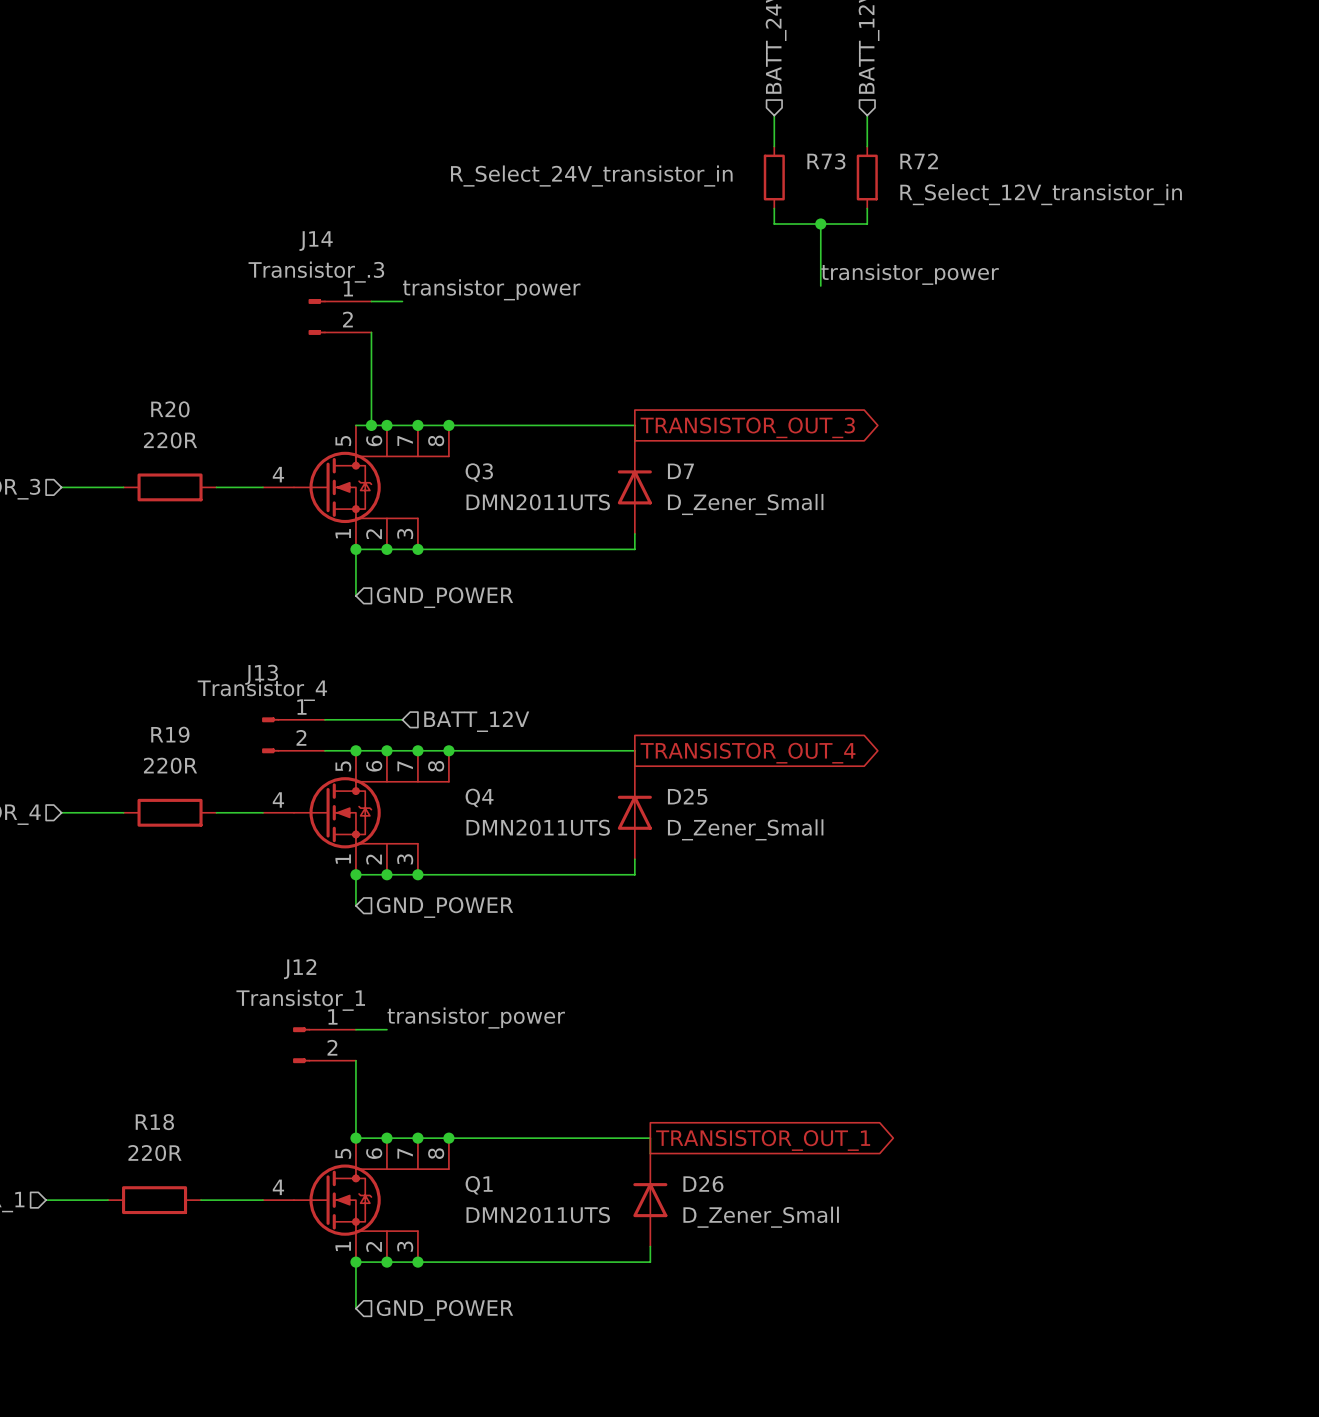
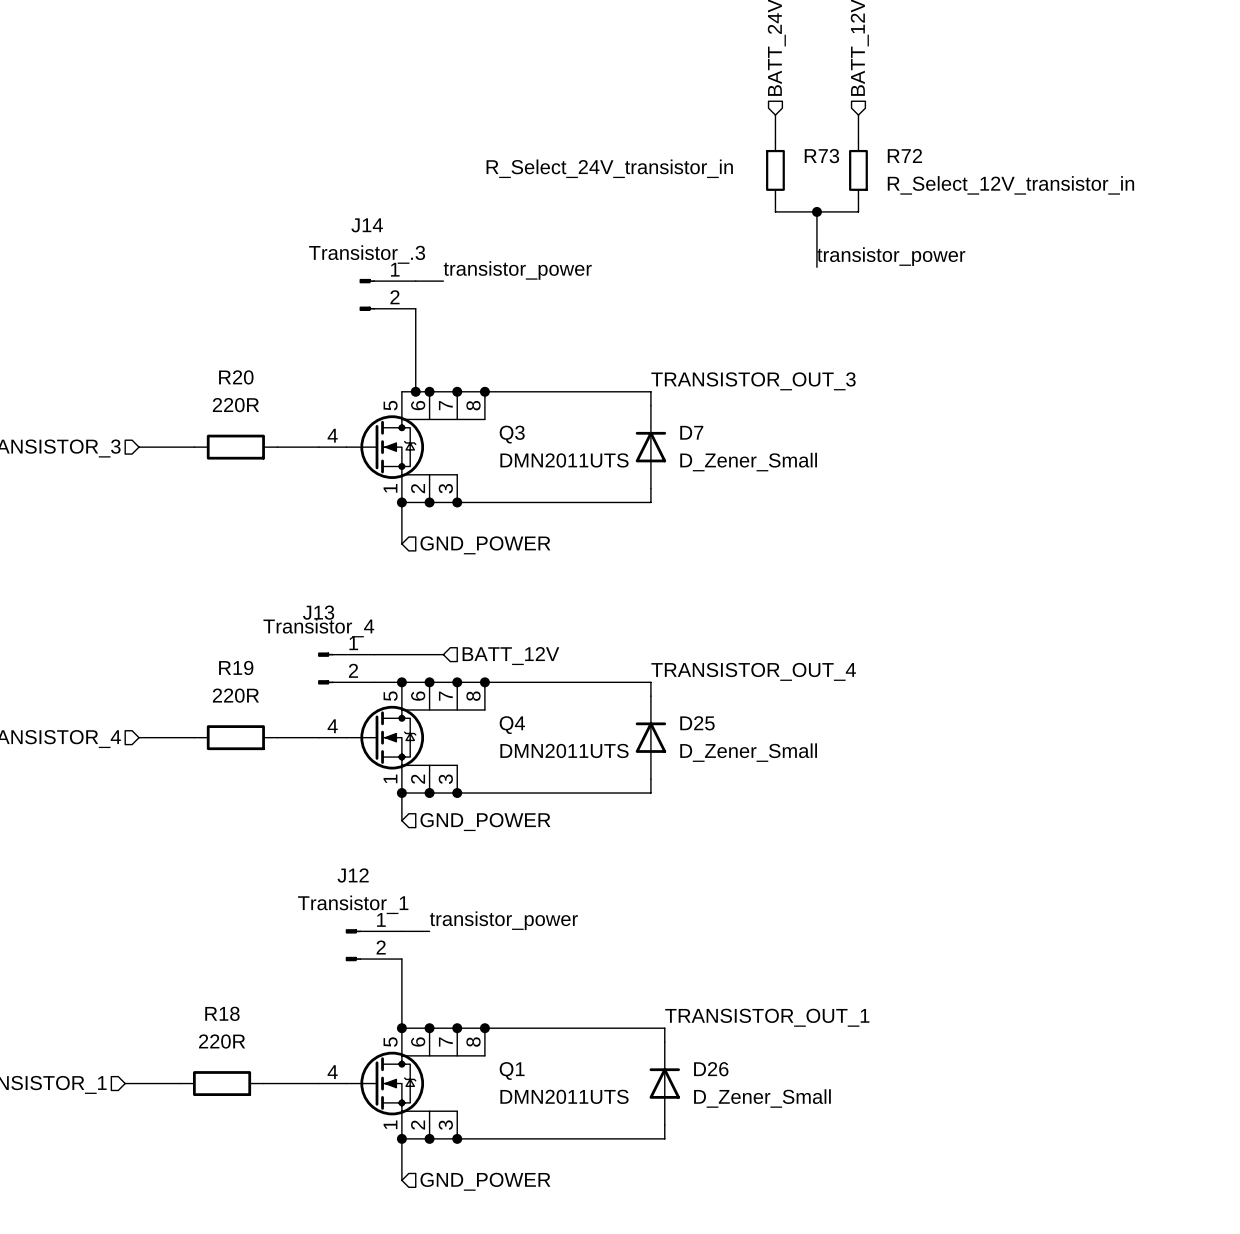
label: none -> TRANSISTOR_OUT_3 (753, 381)
global label: TRANSISTOR_OUT_3 (747, 427) -> none
label: none -> TRANSISTOR_OUT_4 (753, 671)
global label: TRANSISTOR_OUT_4 (748, 753) -> none
label: none -> TRANSISTOR_OUT_1 (767, 1017)
global label: TRANSISTOR_OUT_1 (763, 1140) -> none

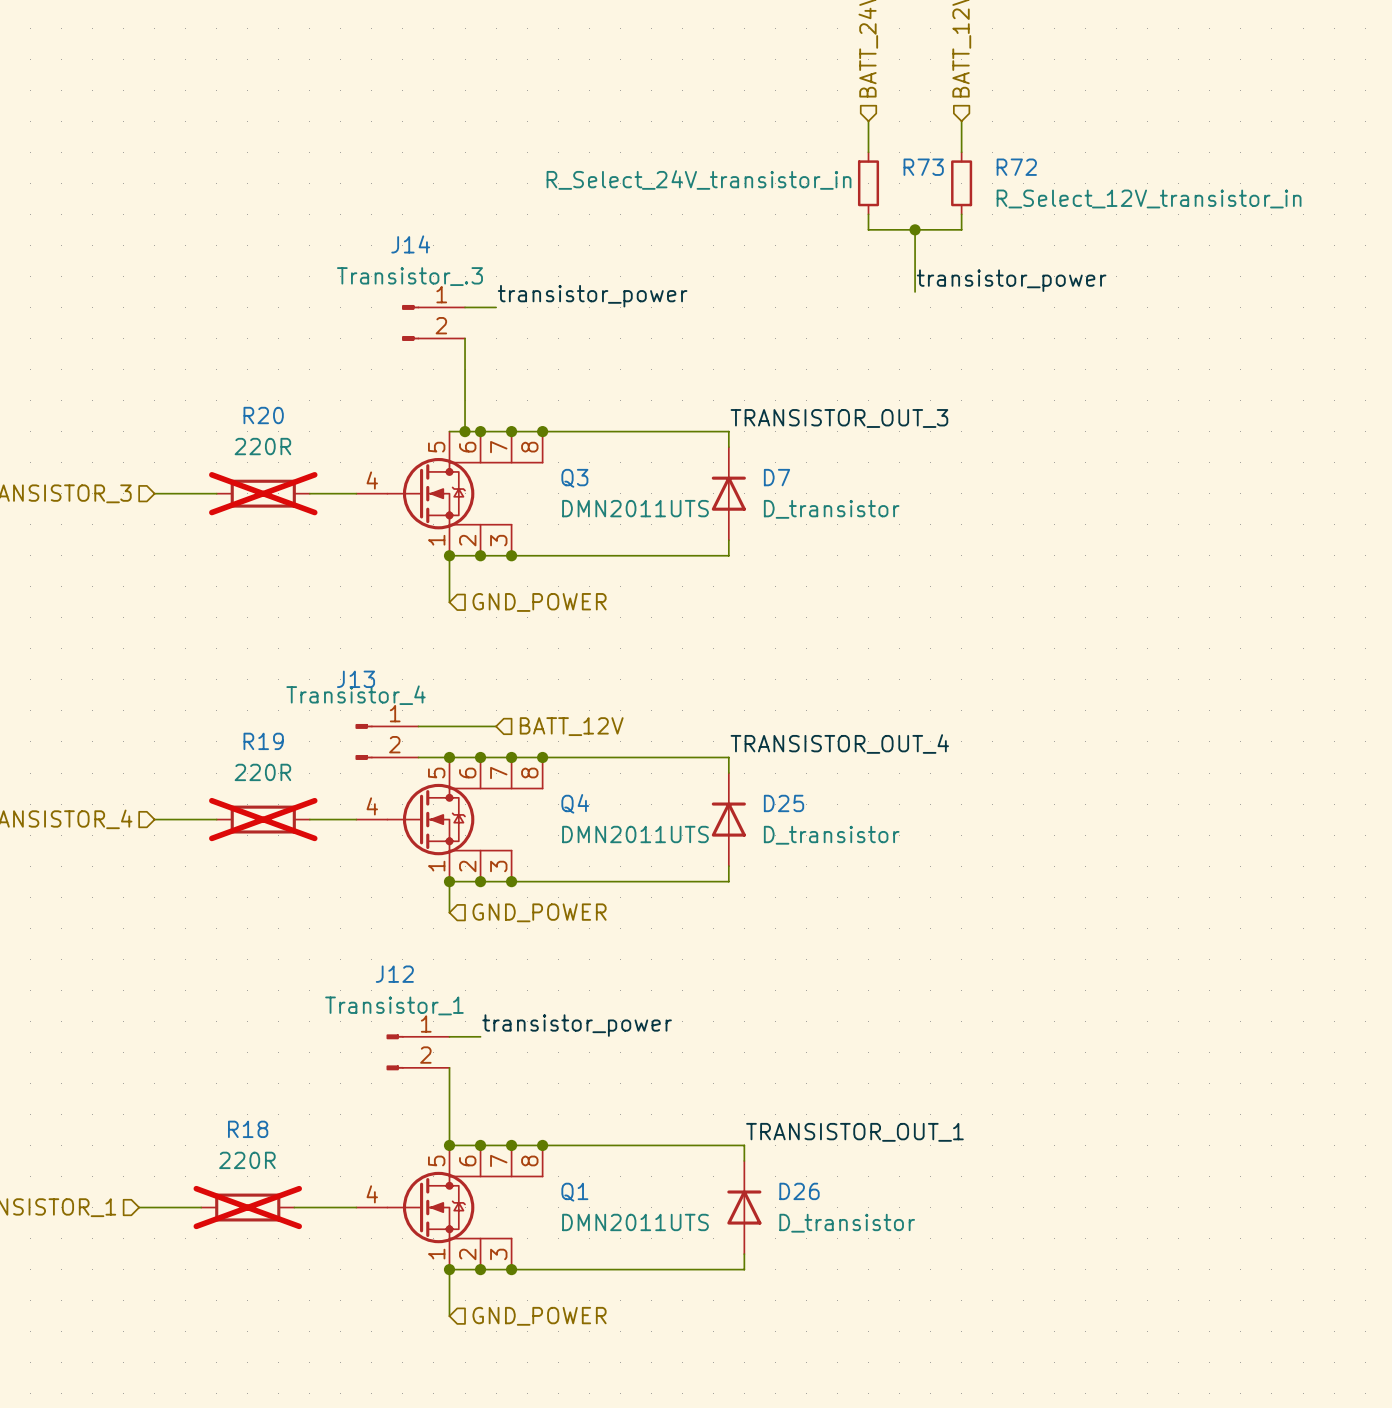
R20 do-not-place cross: none -> (263, 493)
D7 value: D_Zener_Small (748, 462) -> D_transistor (831, 509)
R19 do-not-place cross: none -> (263, 819)
D25 value: D_Zener_Small (748, 752) -> D_transistor (831, 835)
R18 do-not-place cross: none -> (247, 1207)
D26 value: D_Zener_Small (762, 1098) -> D_transistor (847, 1223)

